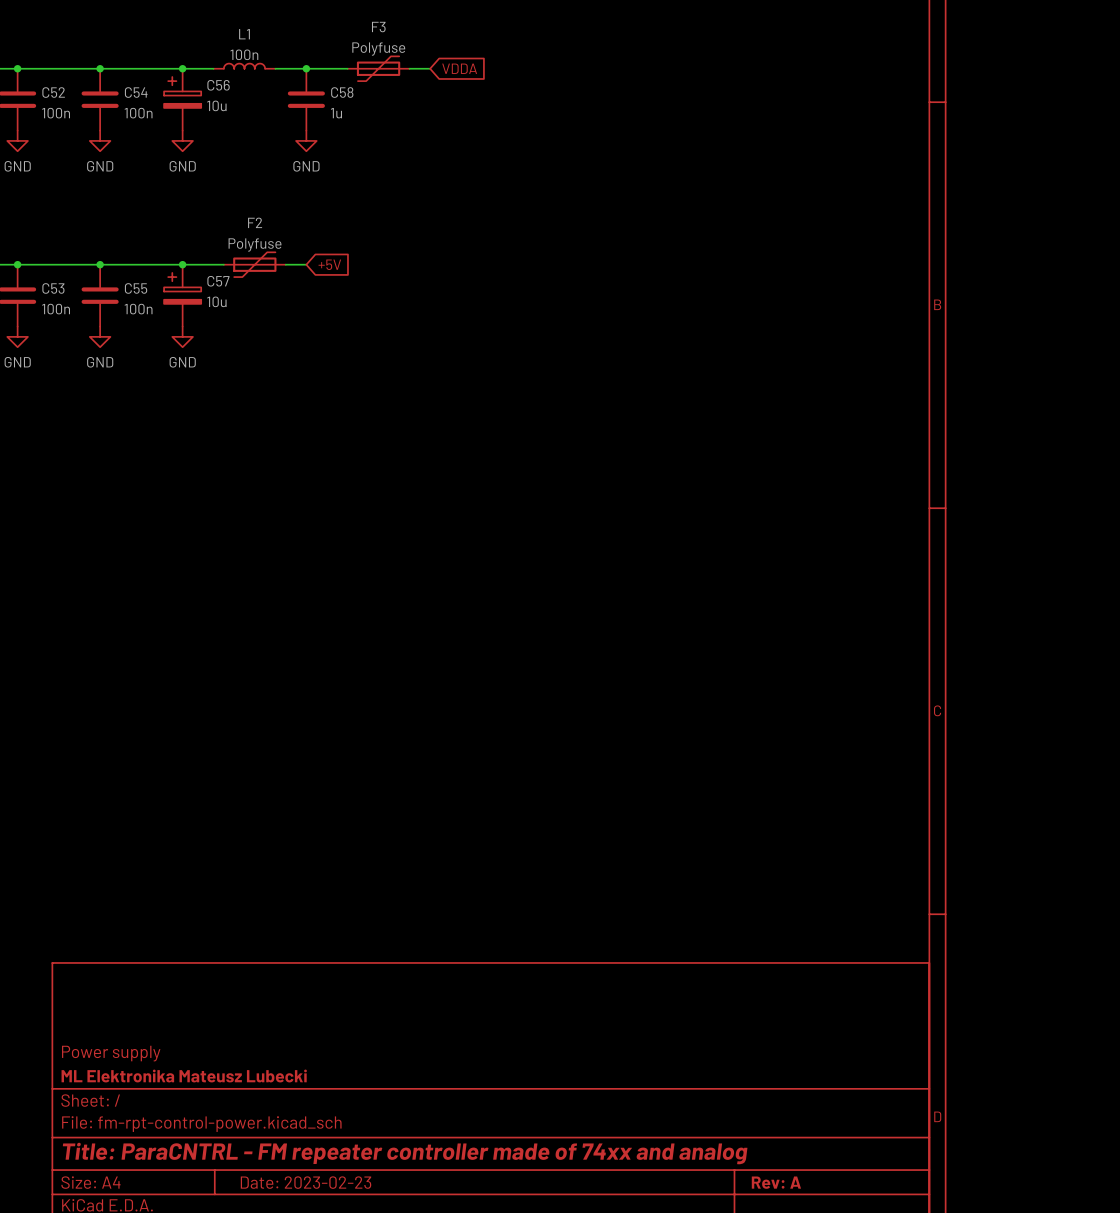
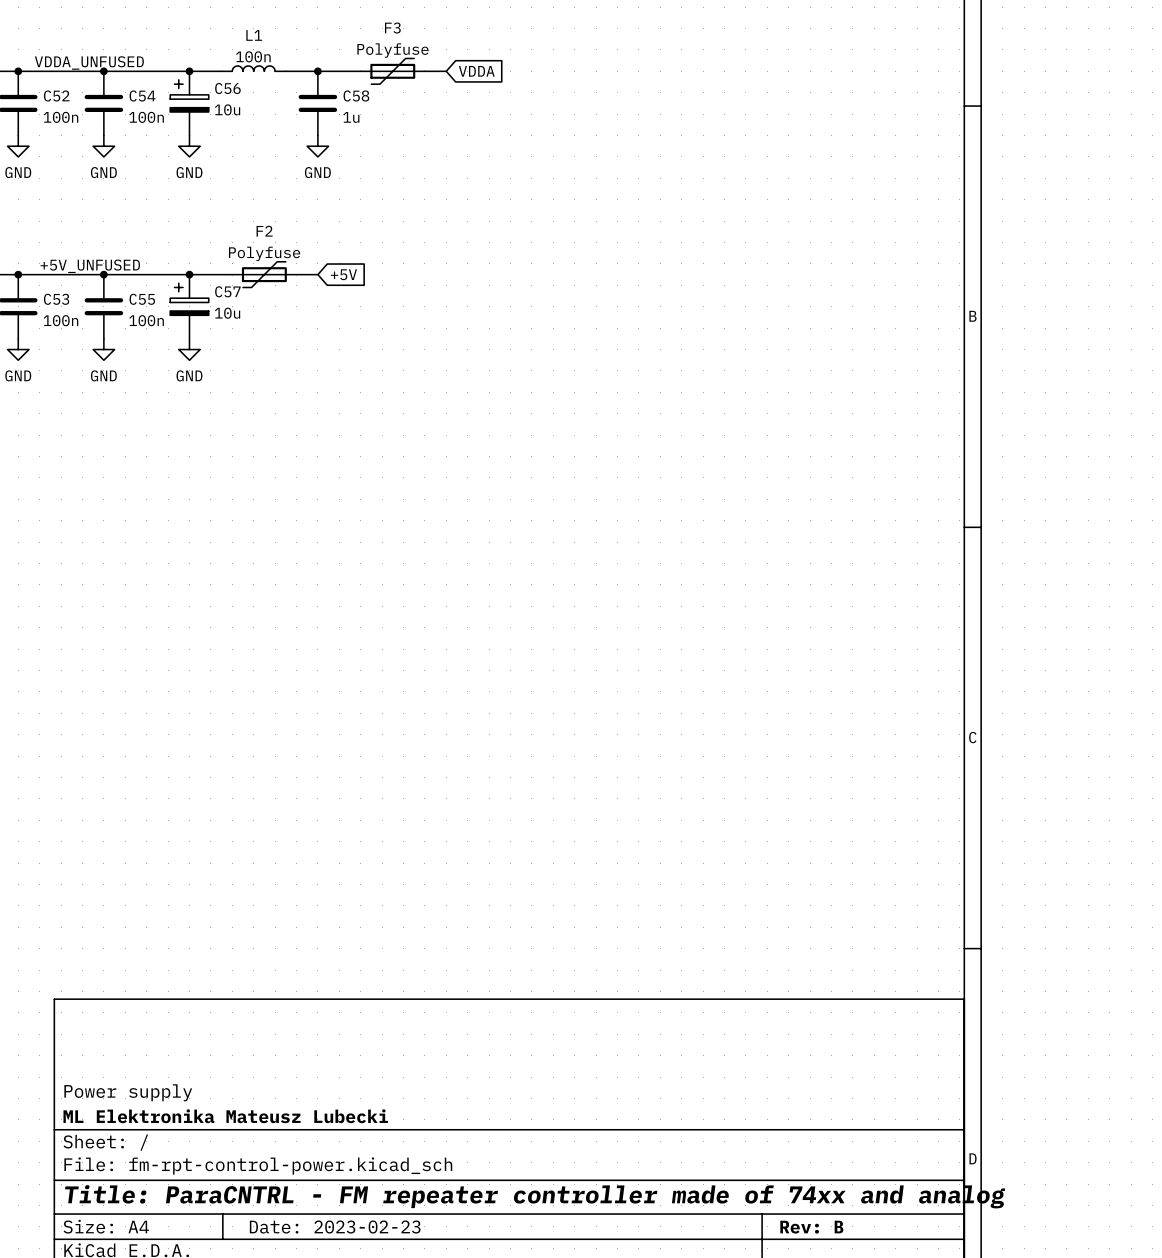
label: none -> VDDA_UNFUSED (89, 62)
label: none -> +5V_UNFUSED (90, 266)
title block: Rev: A (776, 1182) -> Rev: B (811, 1227)

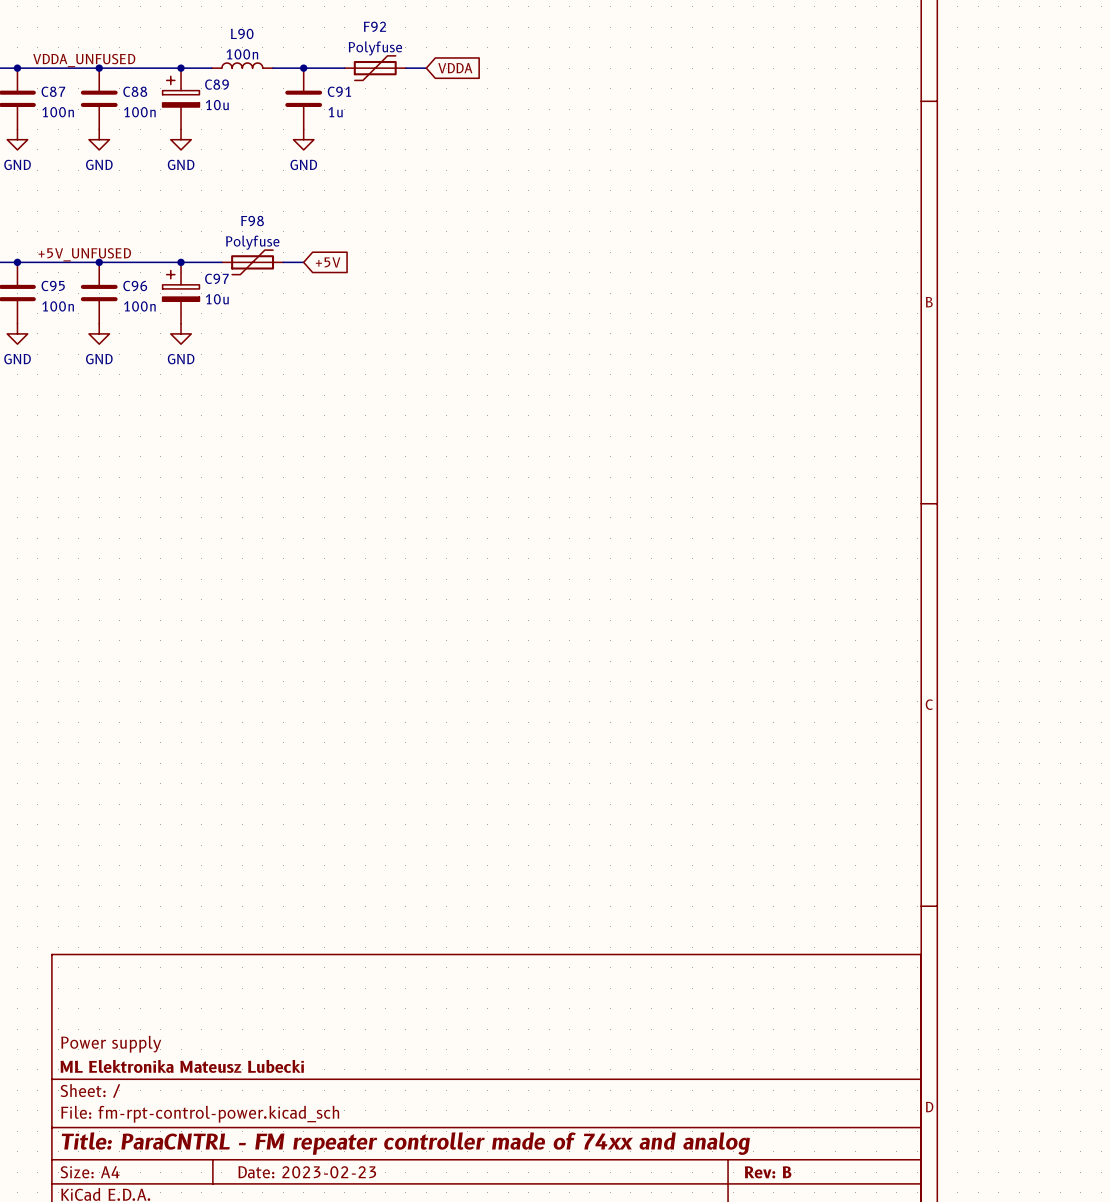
F3 name: F3 (392, 27) -> F92 (374, 26)
L1 name: L1 (254, 35) -> L90 (242, 33)
C56 name: C56 (227, 88) -> C89 (217, 84)
C52 name: C52 (56, 96) -> C87 (53, 91)
C54 name: C54 (142, 96) -> C88 (135, 91)
C58 name: C58 (356, 96) -> C91 (339, 91)
F2 name: F2 (264, 231) -> F98 (252, 221)
C57 name: C57 (227, 291) -> C97 (216, 278)
C53 name: C53 (56, 299) -> C95 (53, 286)
C55 name: C55 (142, 299) -> C96 (135, 286)

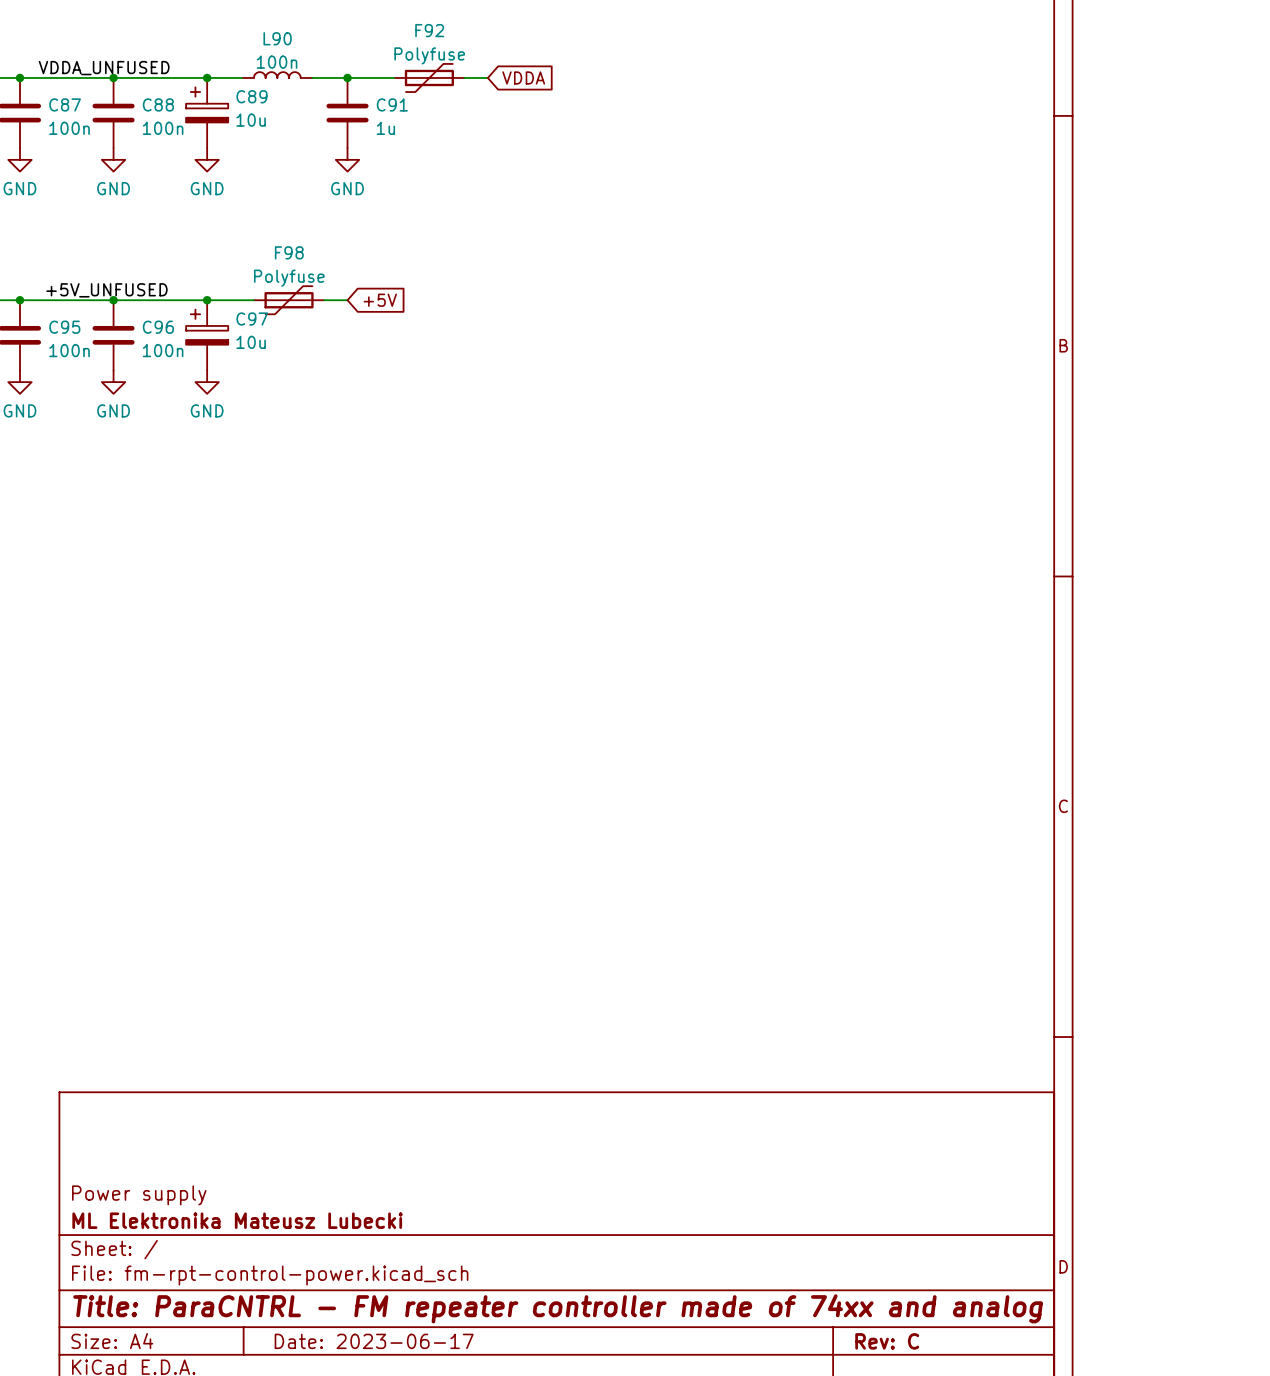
title block: Date: 2023-02-23 (307, 1172) -> Date: 2023-06-17 (374, 1341)
title block: Rev: B (768, 1172) -> Rev: C (887, 1341)

